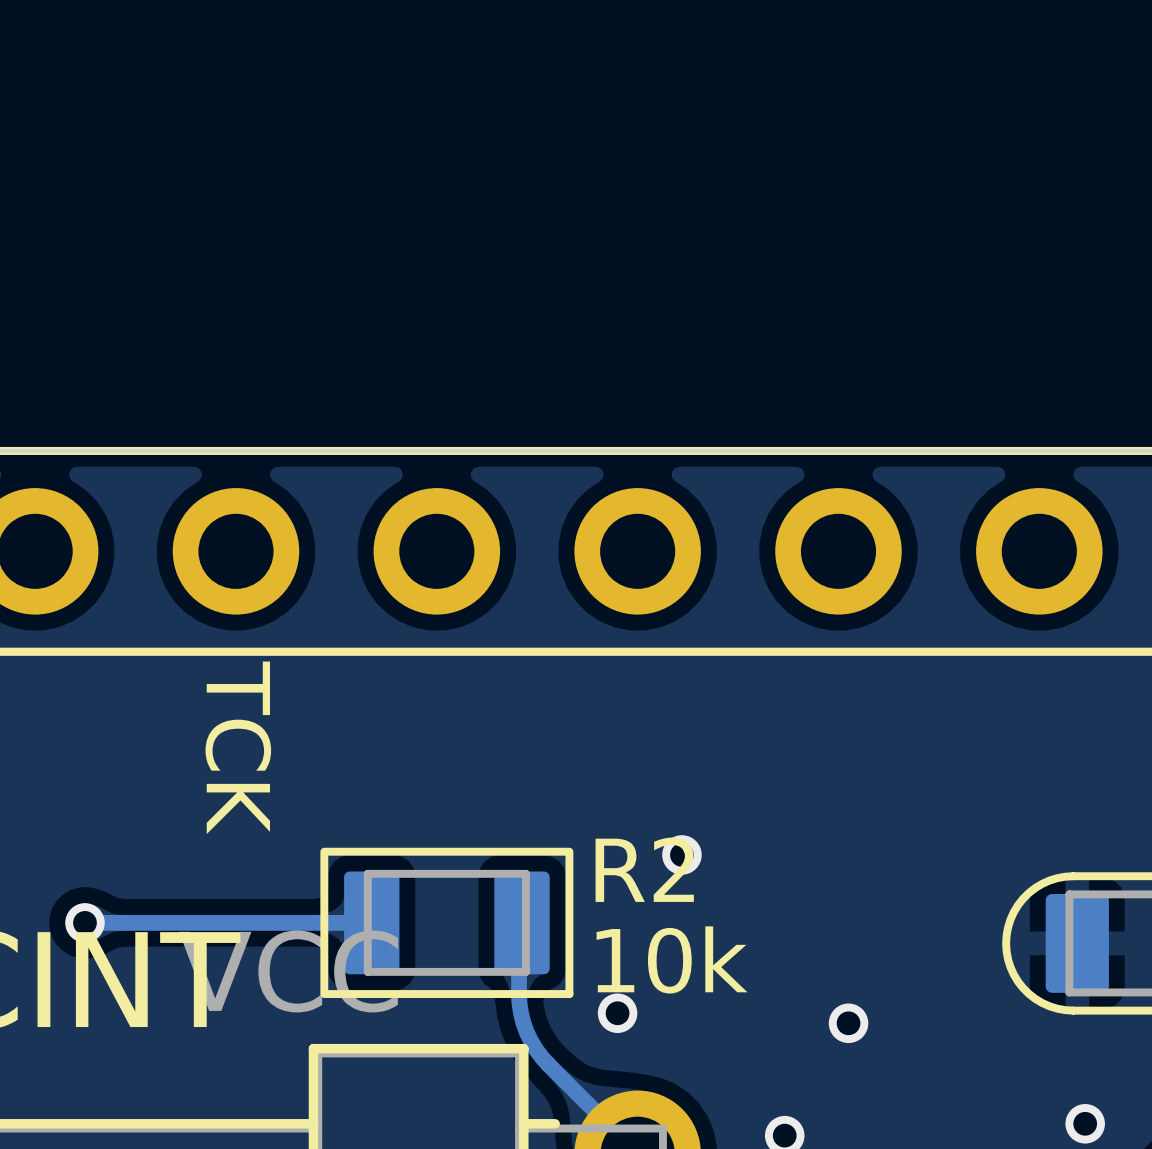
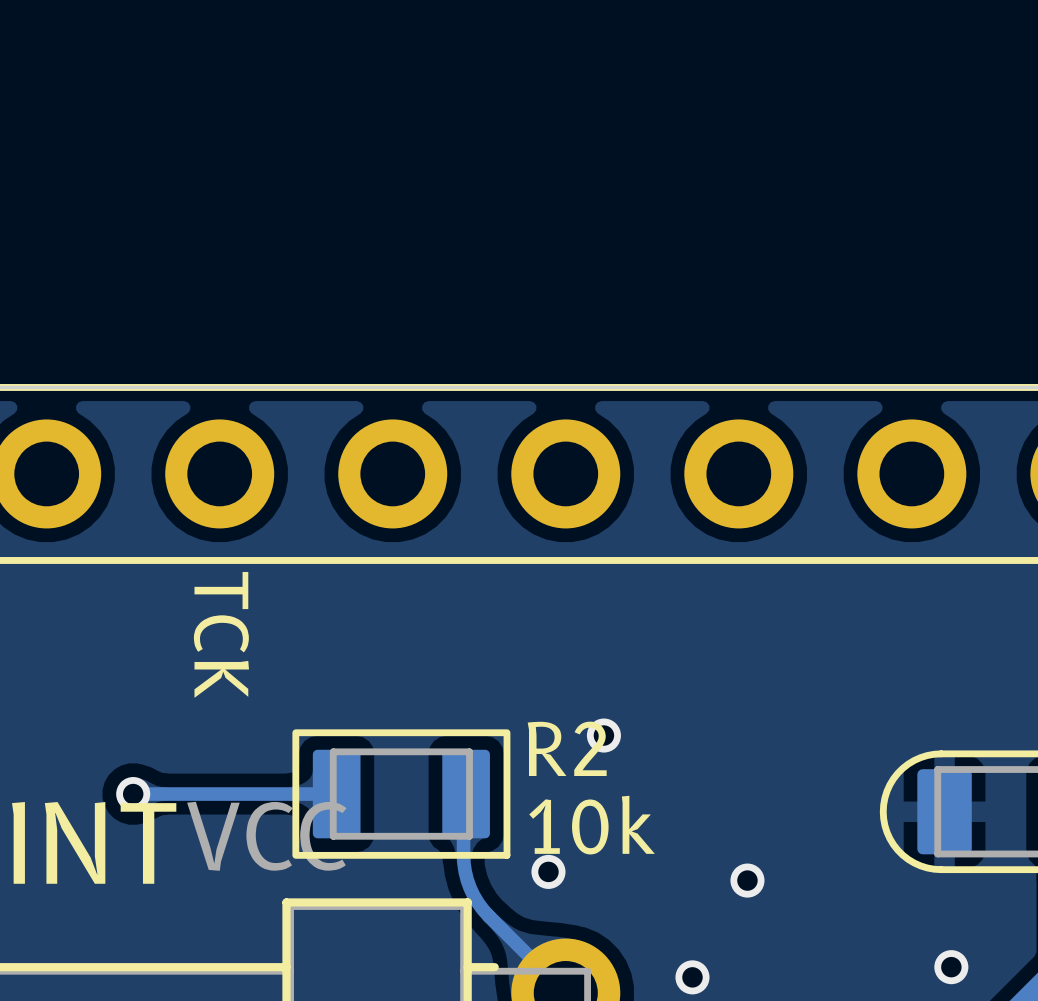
via position: (84, 922) -> (133, 794)
track: (135, 922) (84, 922) -> none

